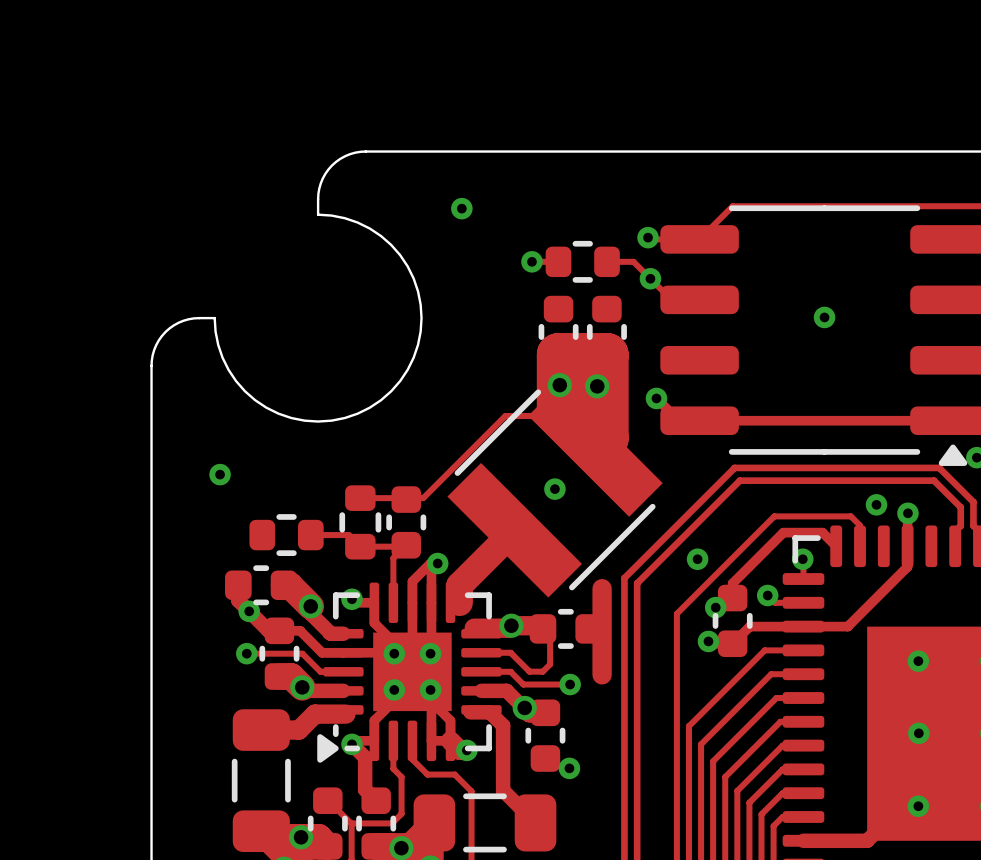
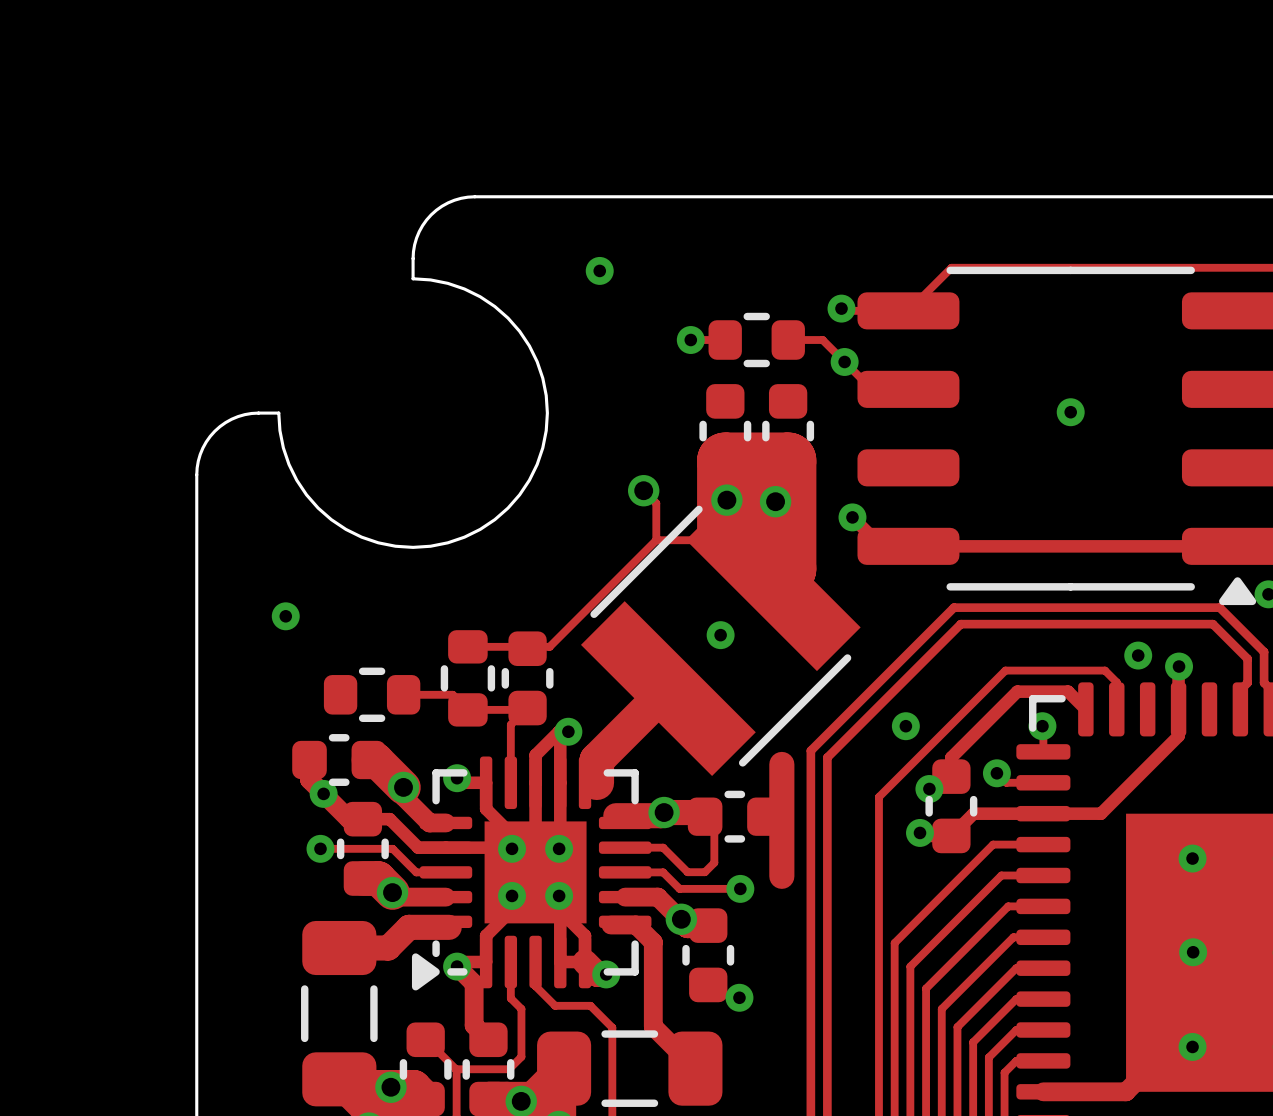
track: none -> (643, 490) (656, 503) (656, 540)
via: none -> (643, 490)

